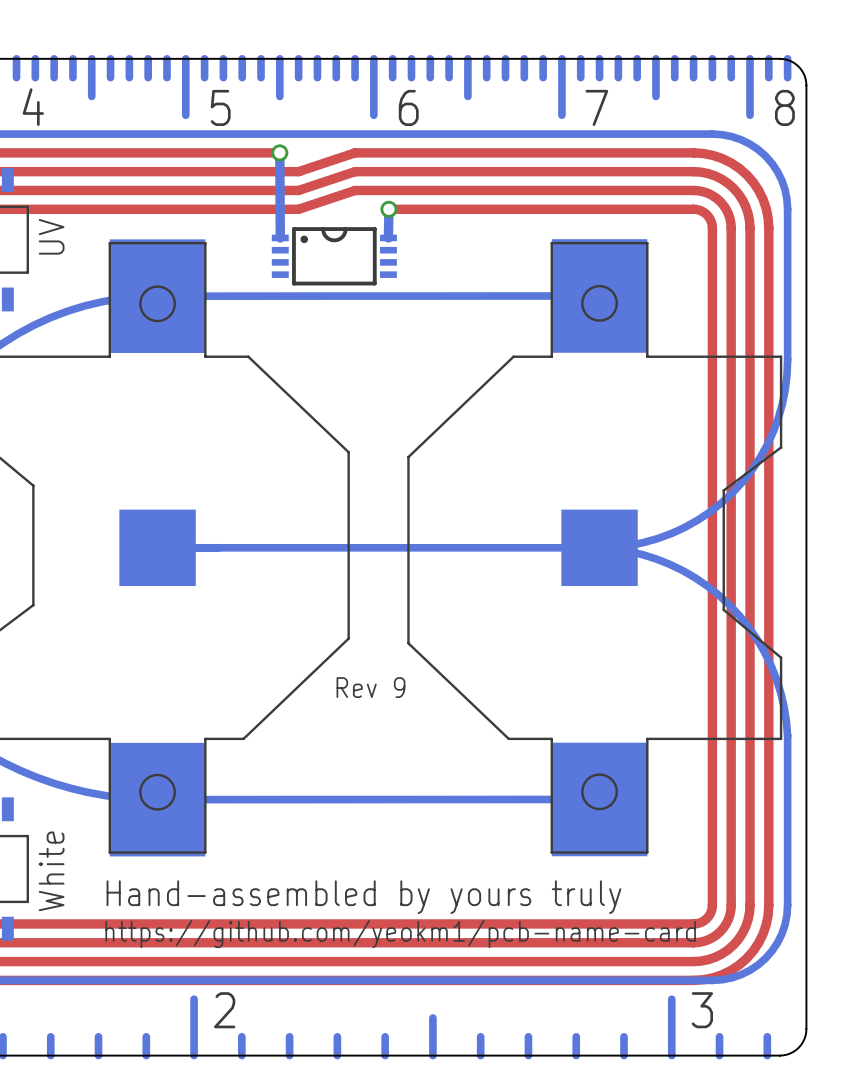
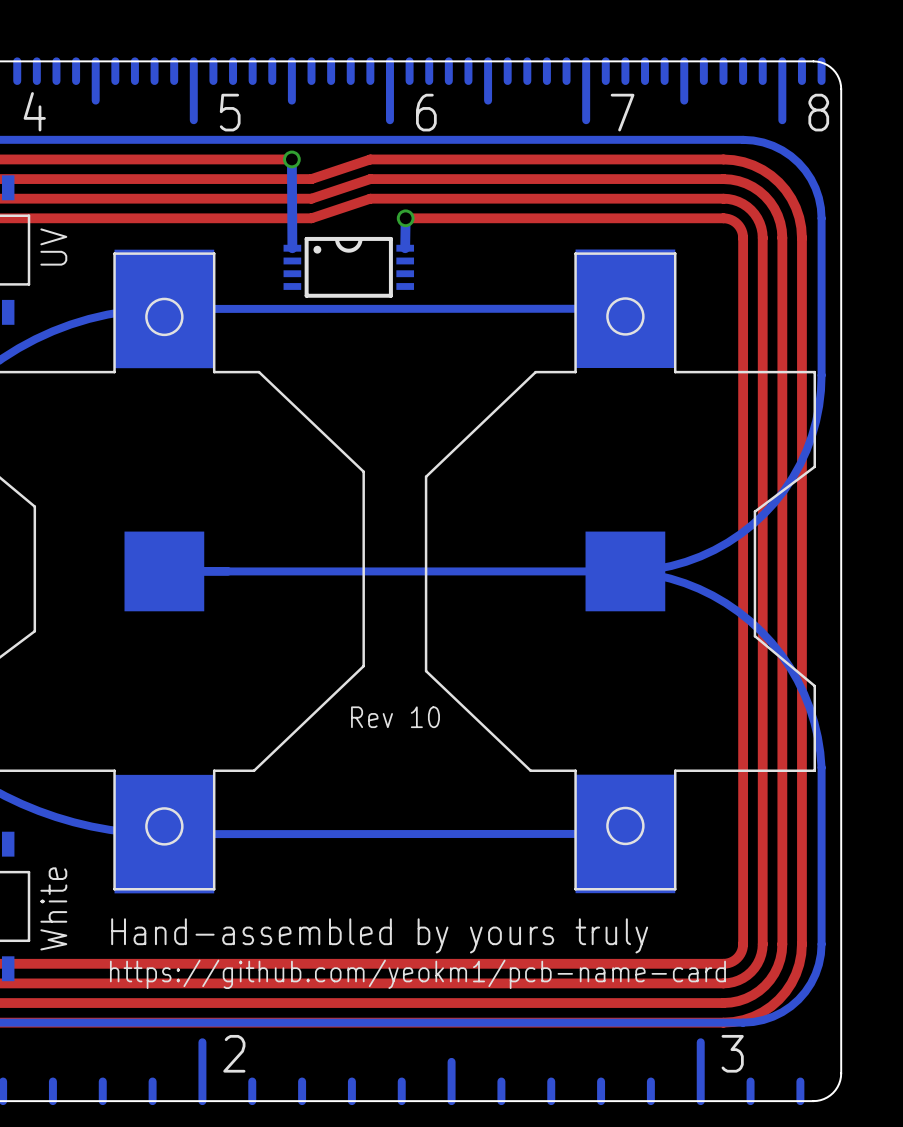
text: Rev 9 (370, 687) -> Rev 10 (395, 717)

